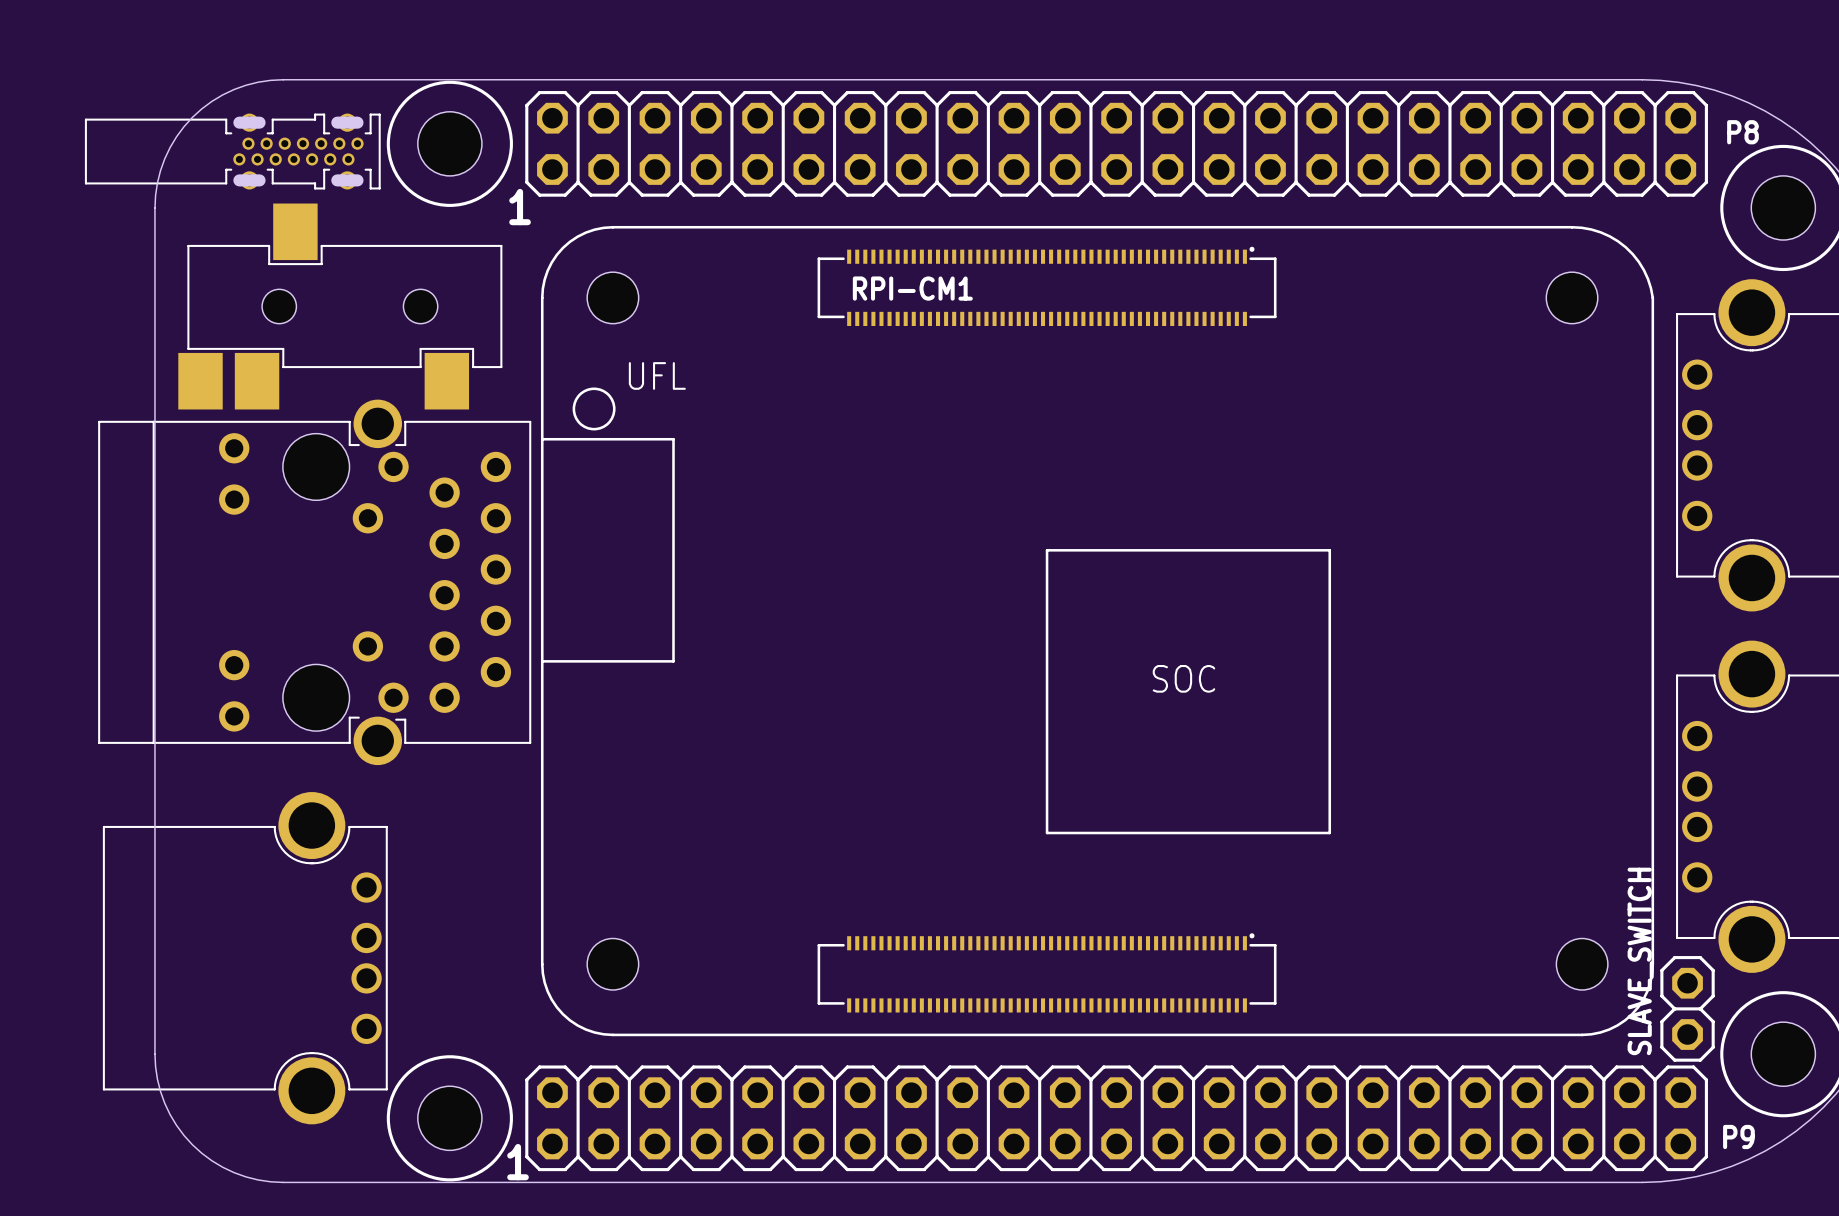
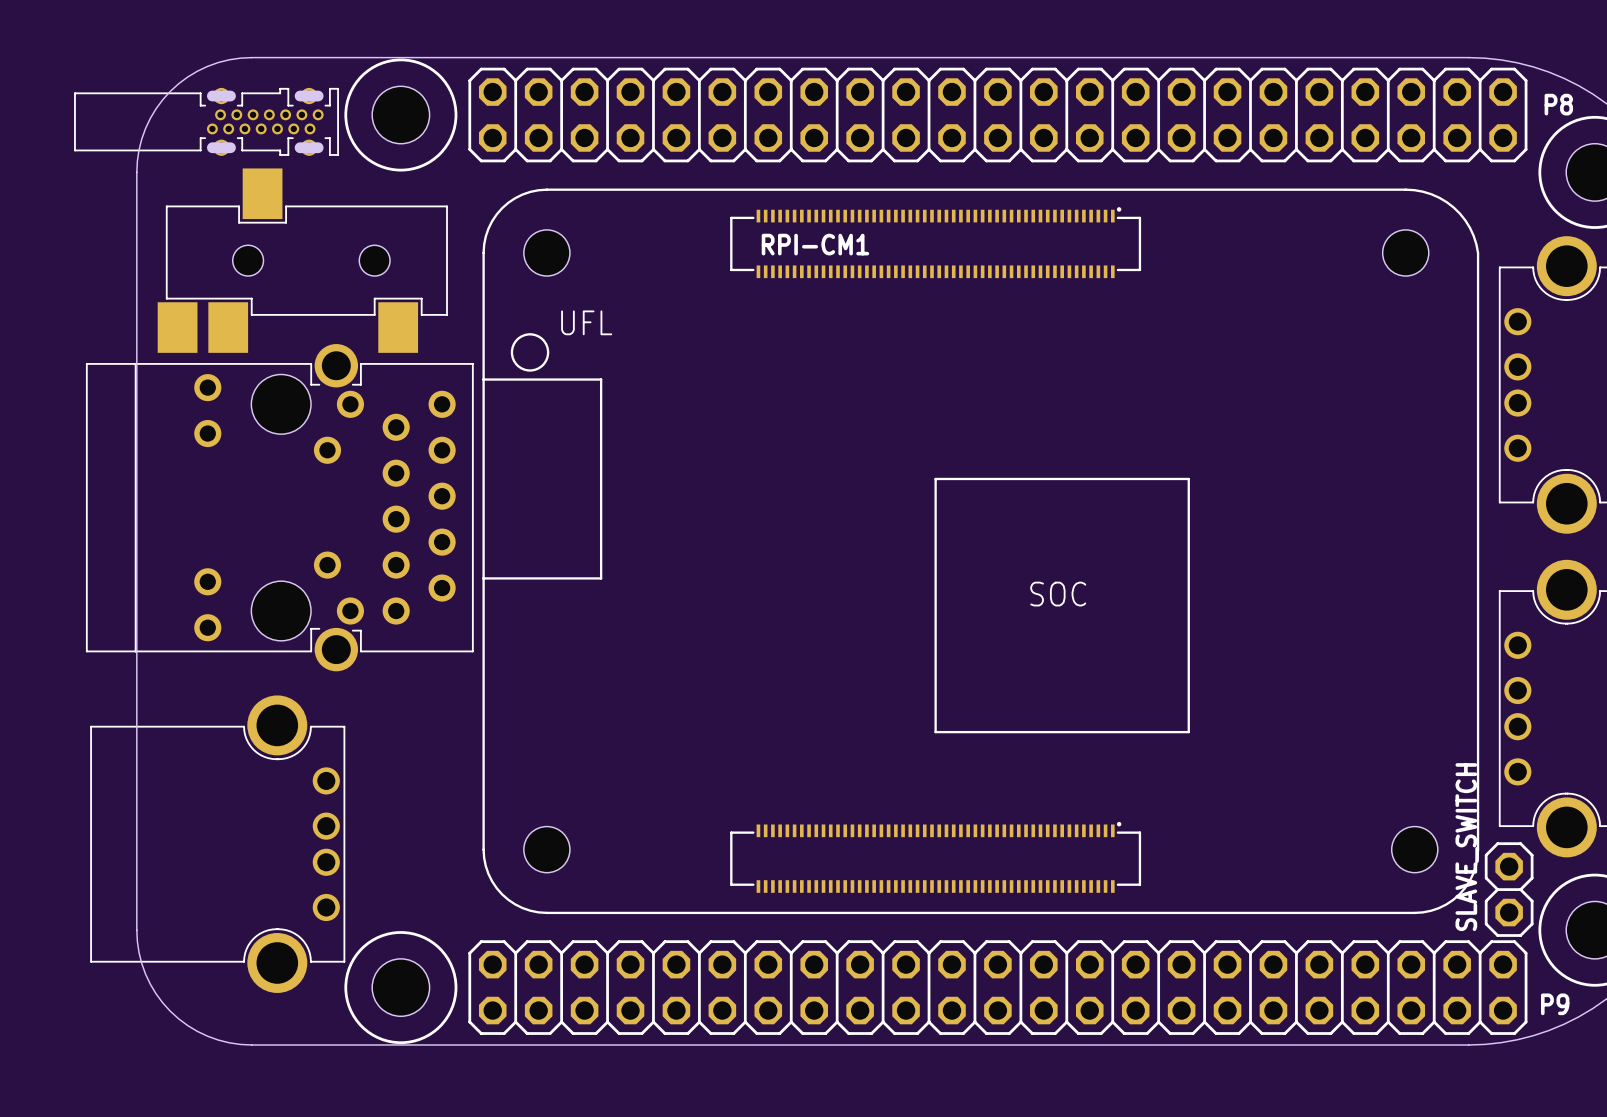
text: 1 (520, 207) -> none
text: 1 (518, 1162) -> none

